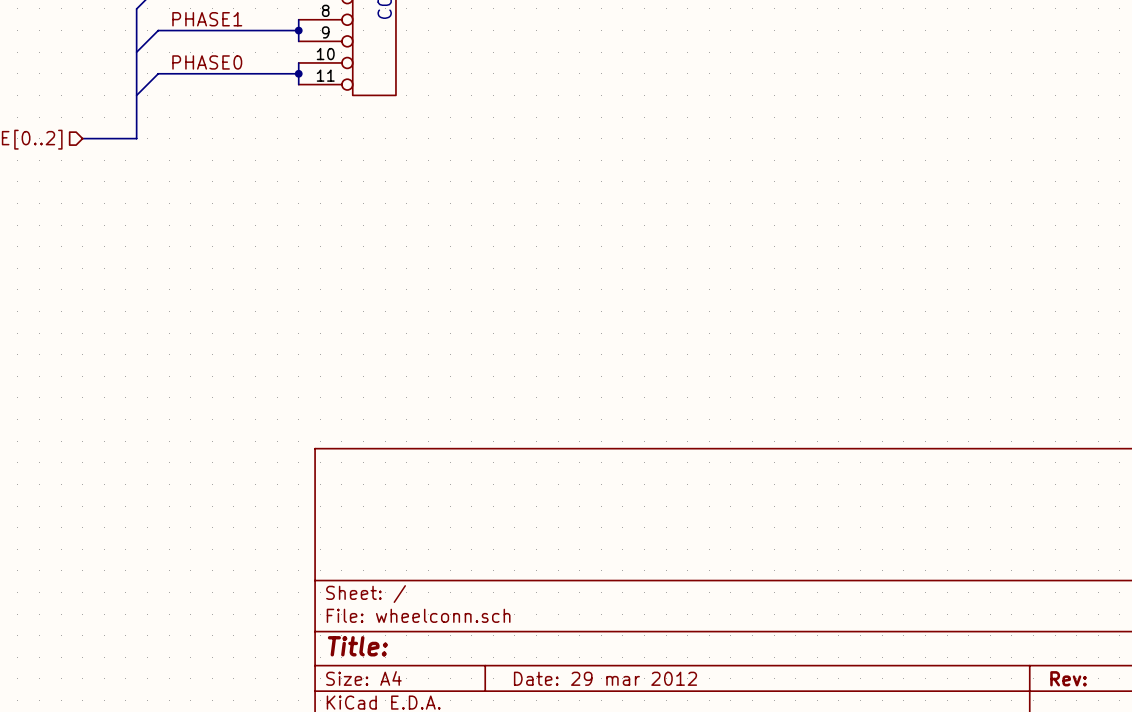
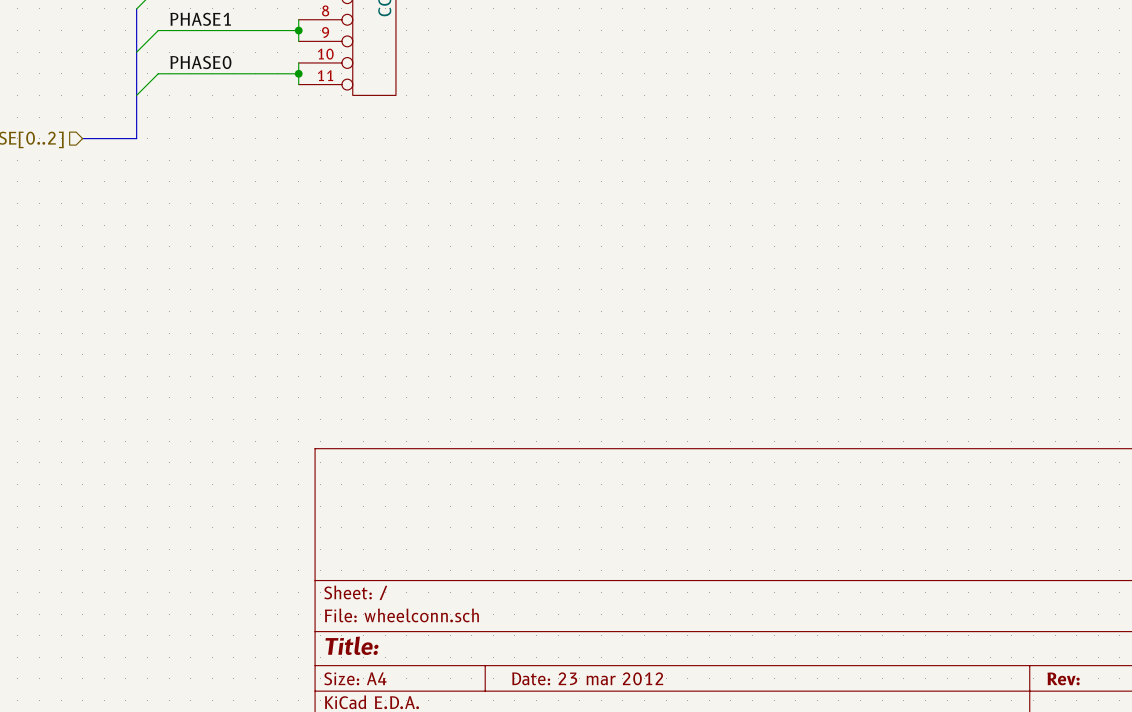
title block: Date: 29 mar 2012 (605, 678) -> Date: 23 mar 2012 (587, 678)

